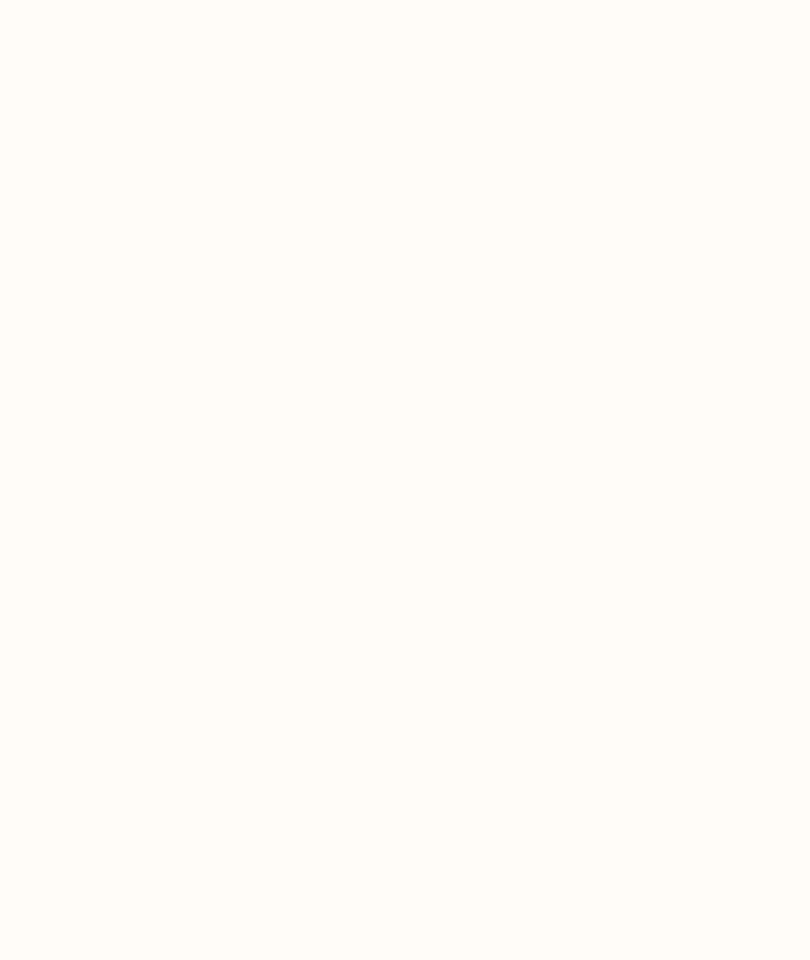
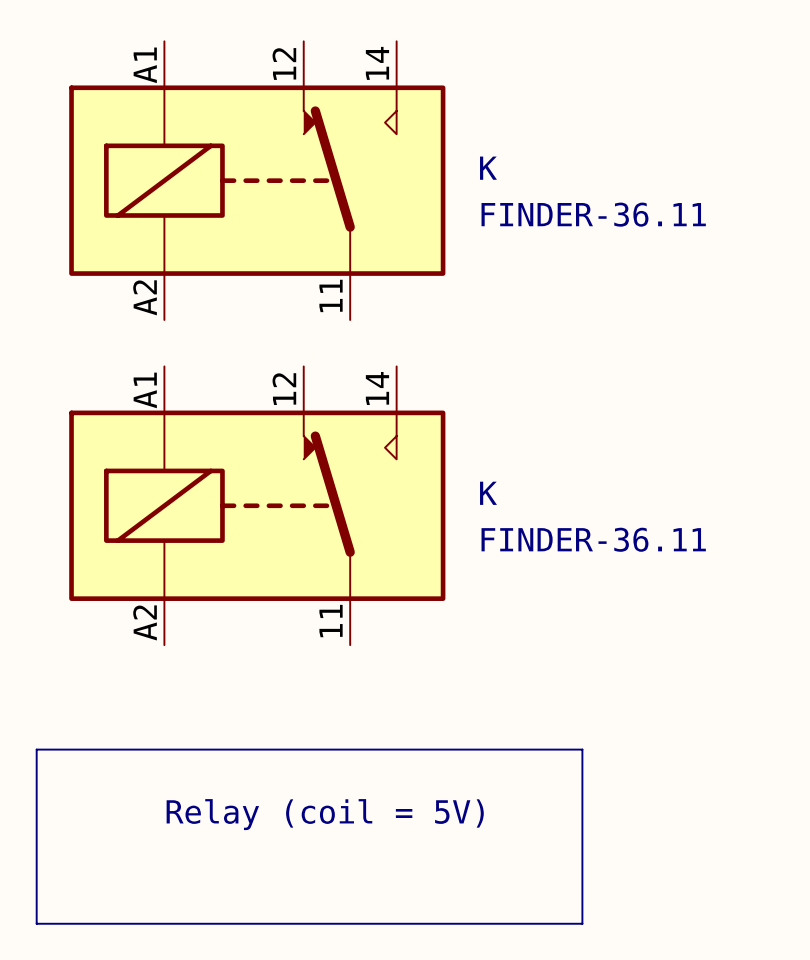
K: none -> FINDER-36.11 (257, 180)
K: none -> FINDER-36.11 (257, 505)
line: none -> (36, 749) (582, 749) (582, 923) (36, 923) (36, 749)
text: none -> Relay (coil = 5V) (325, 814)

